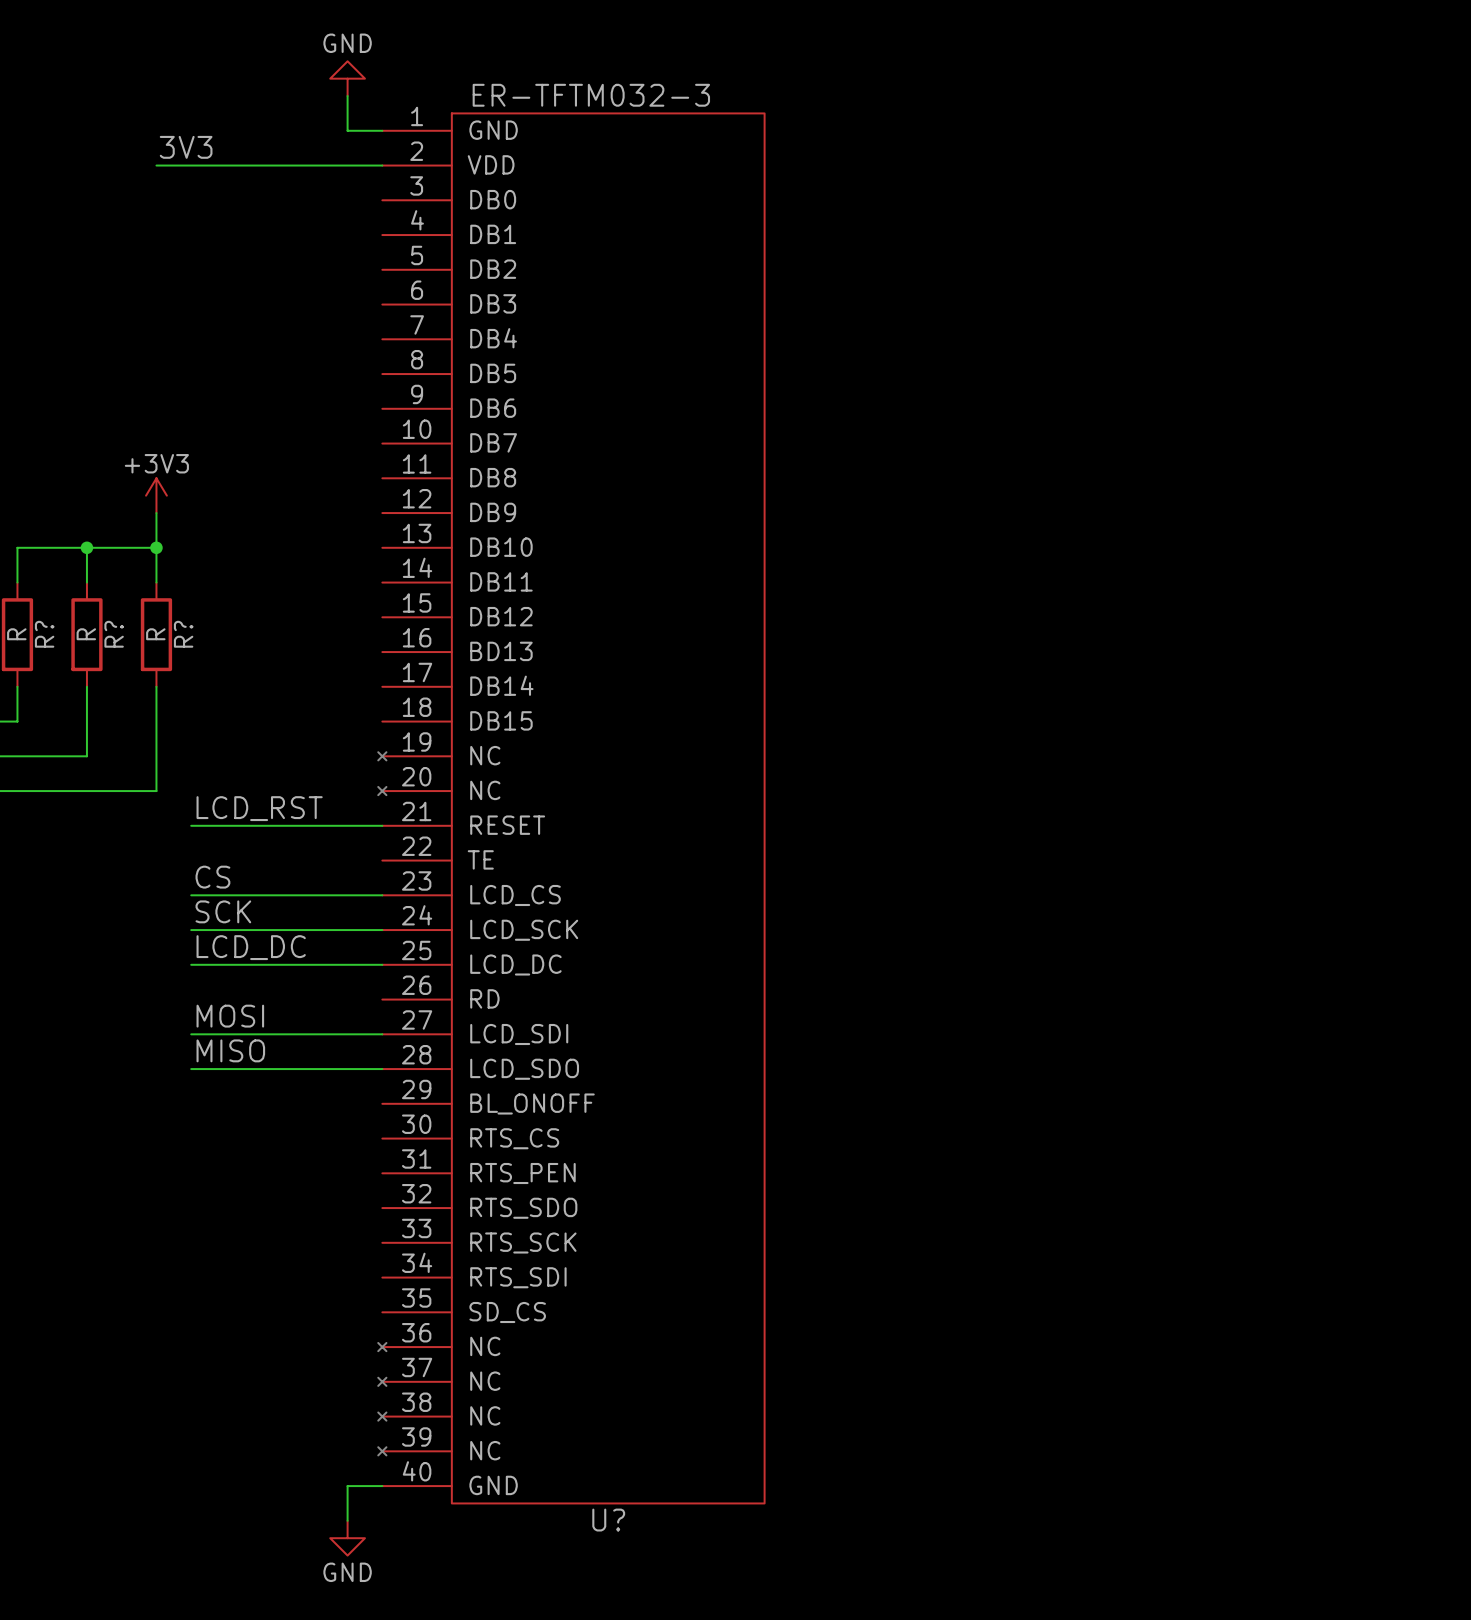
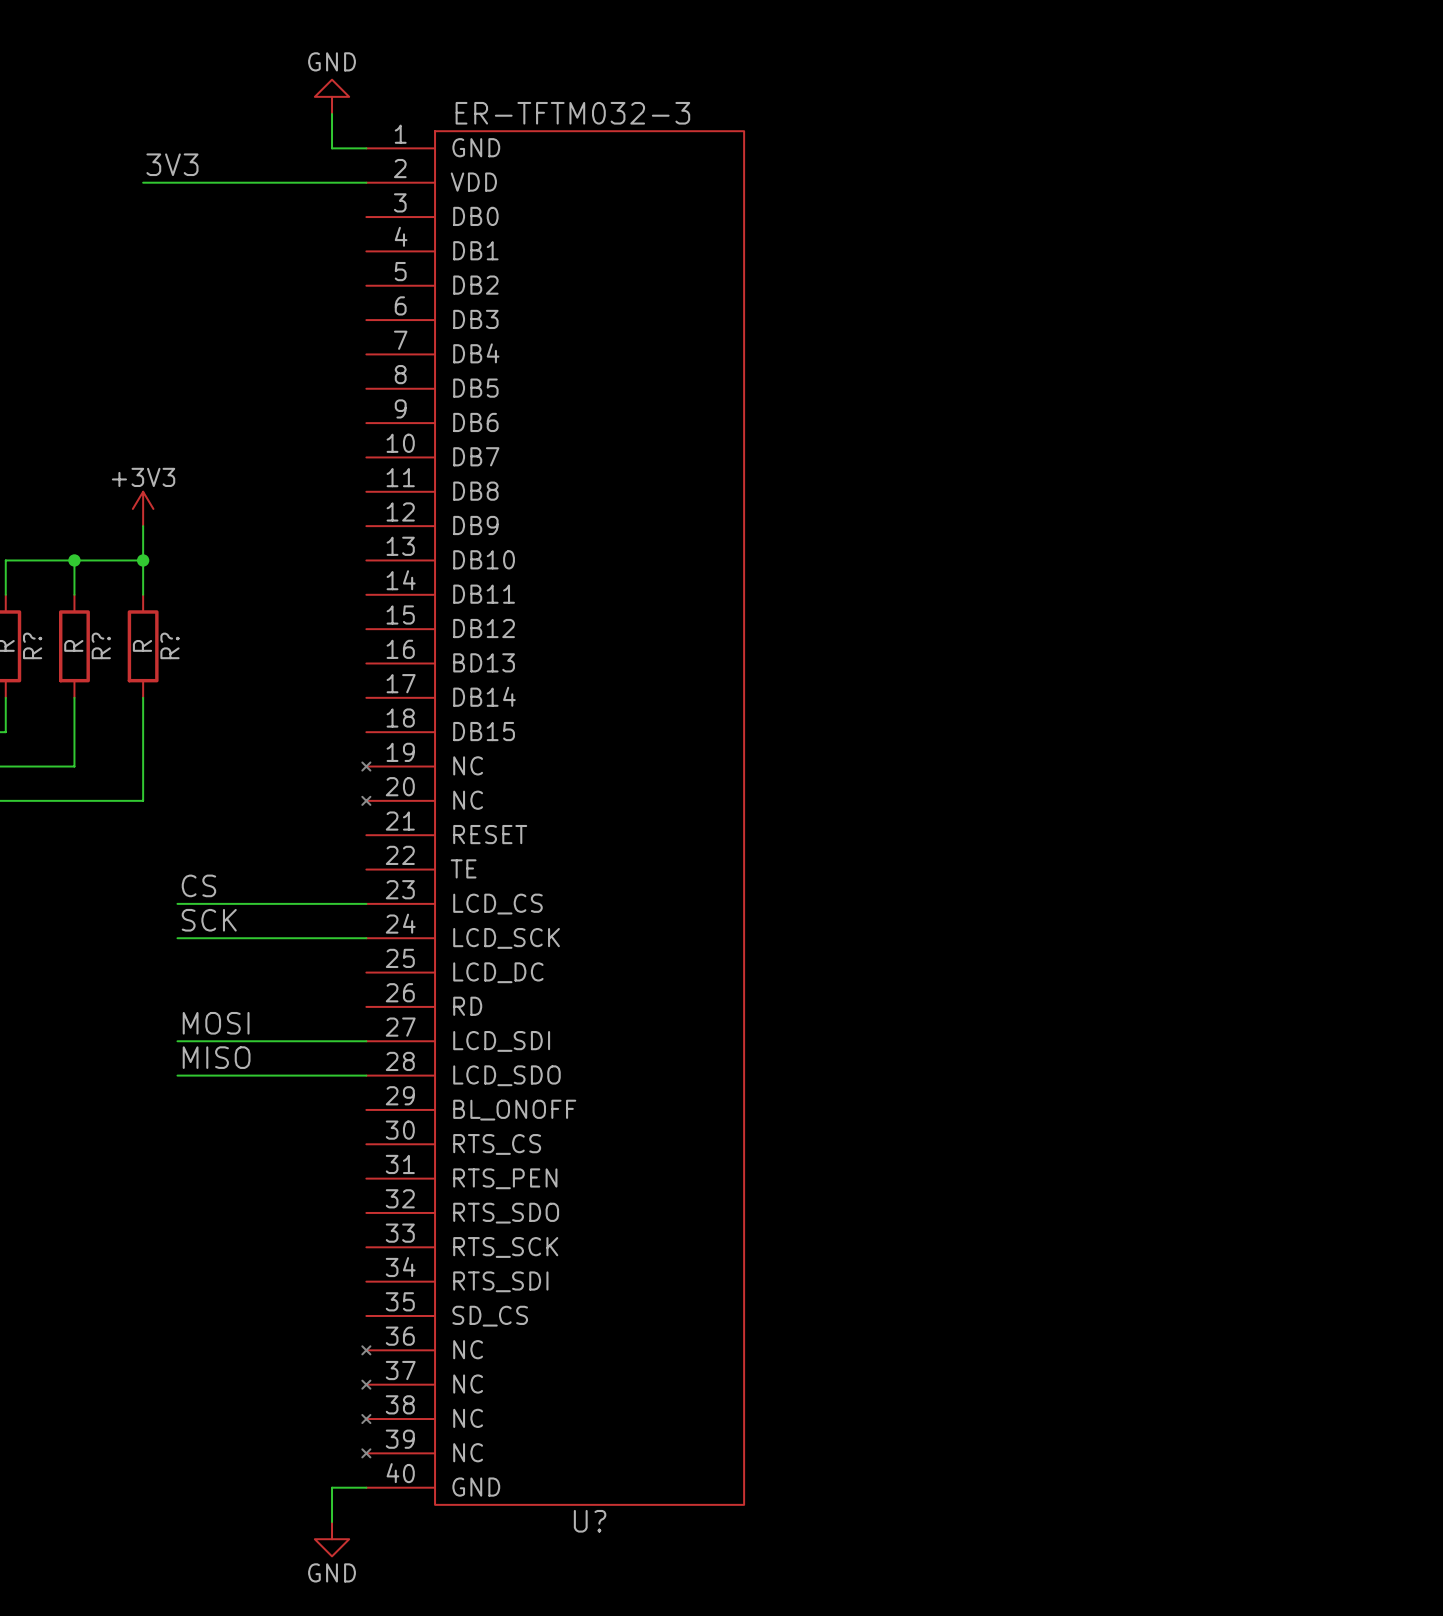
label: LCD_RST (259, 808) -> none
wire: (191, 825) (382, 825) -> none
label: LCD_DC (251, 947) -> none
wire: (191, 964) (382, 964) -> none

